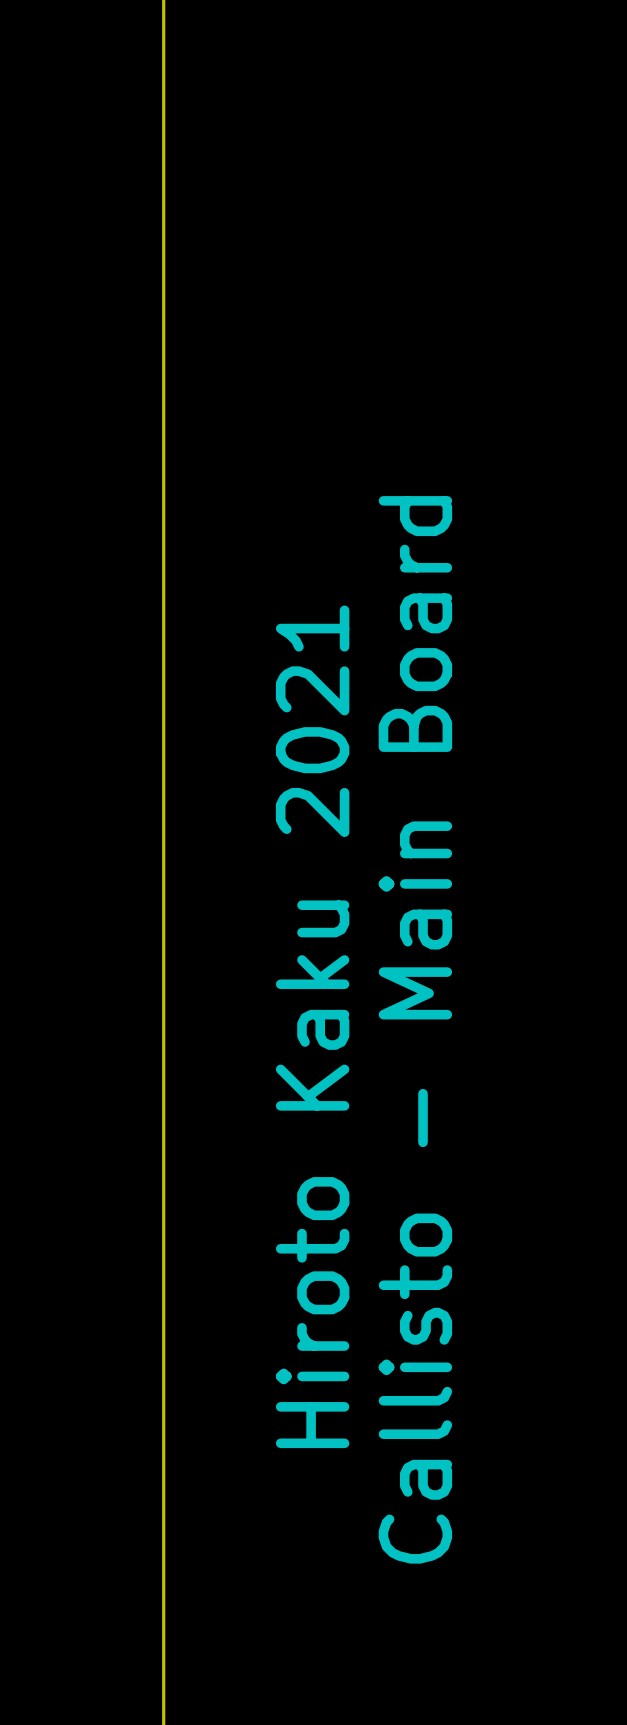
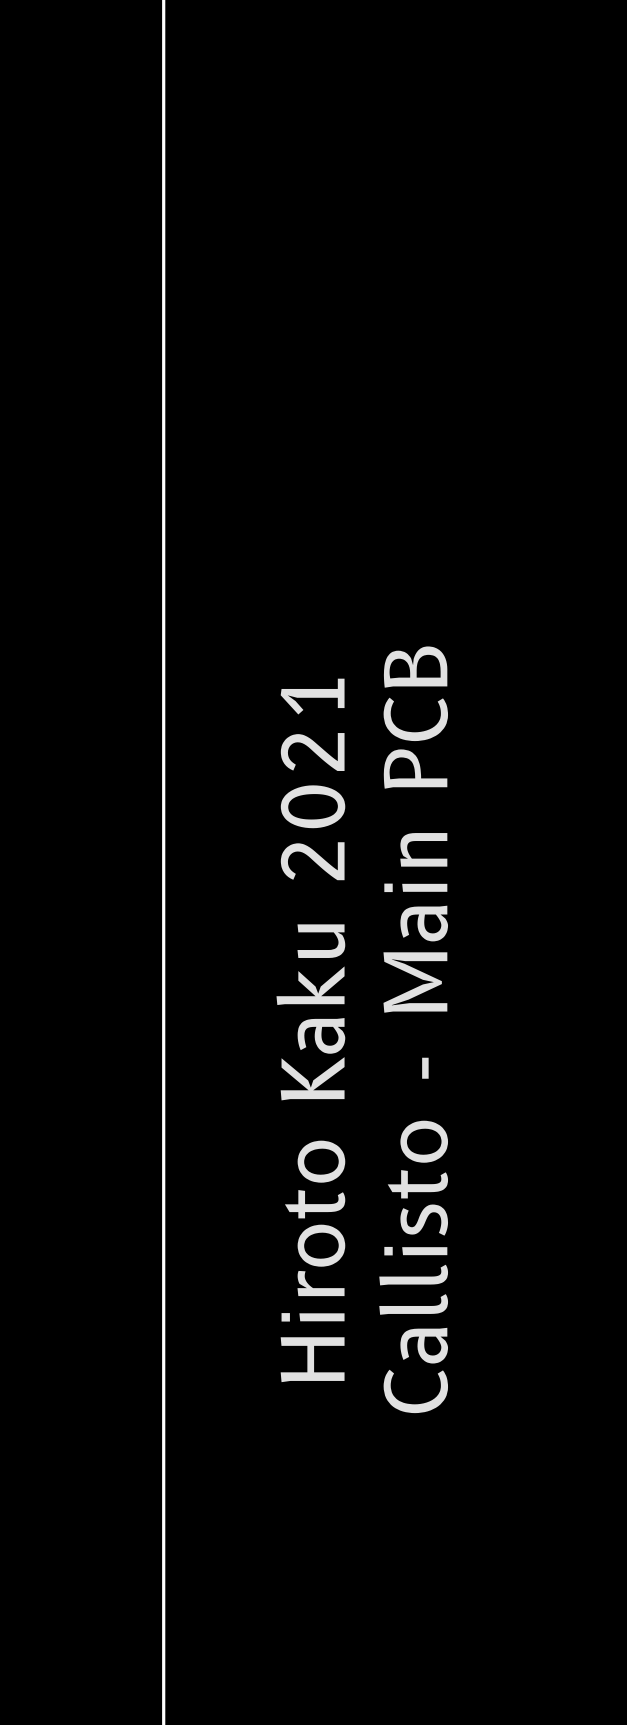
text: Callisto - Main Board (415, 1029) -> Callisto - Main PCB (413, 1029)

